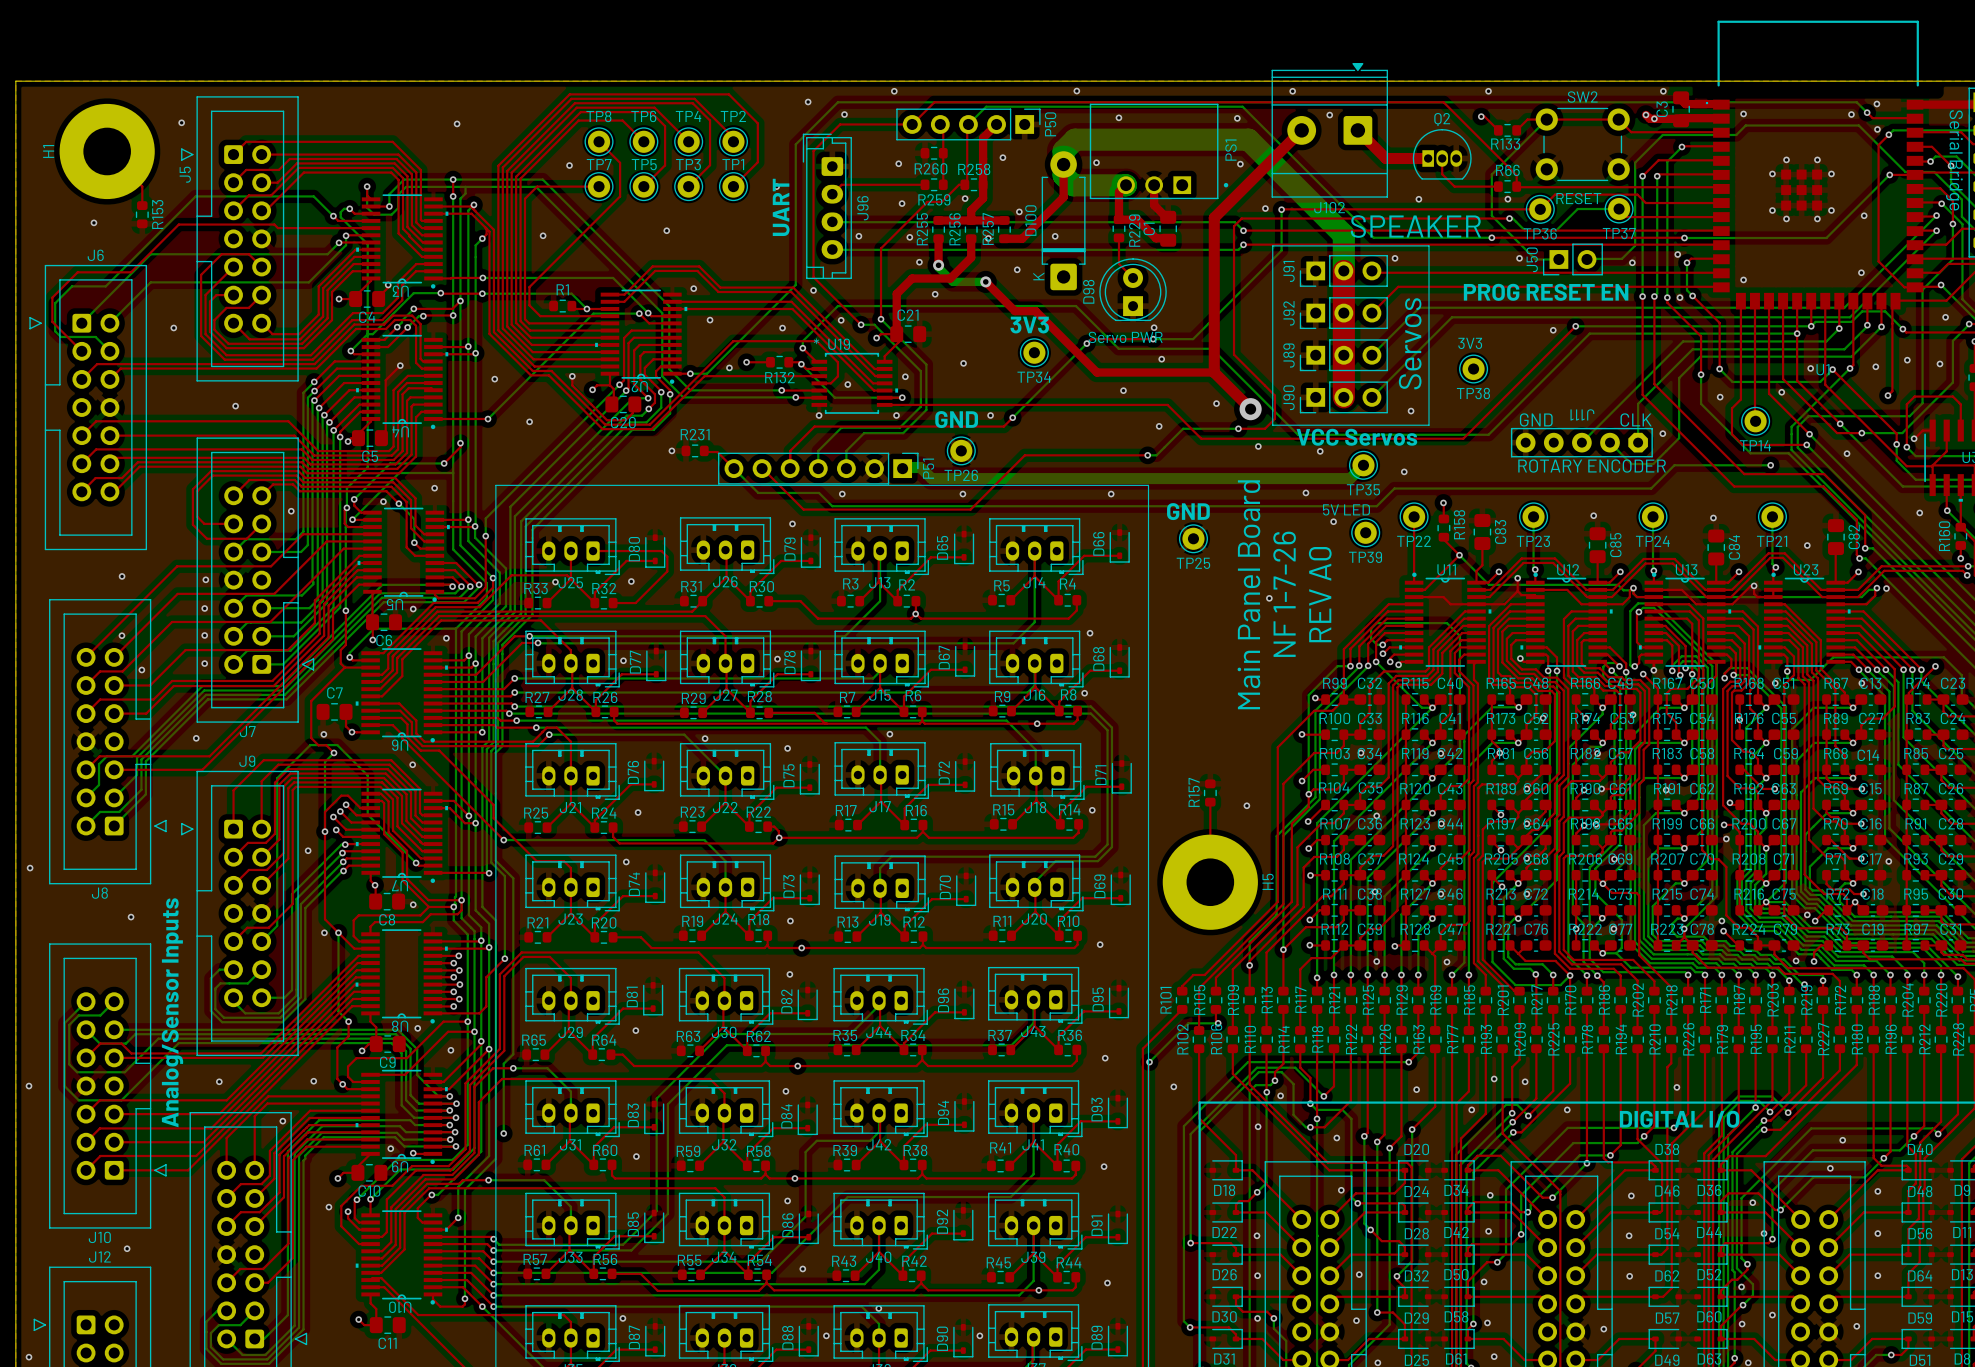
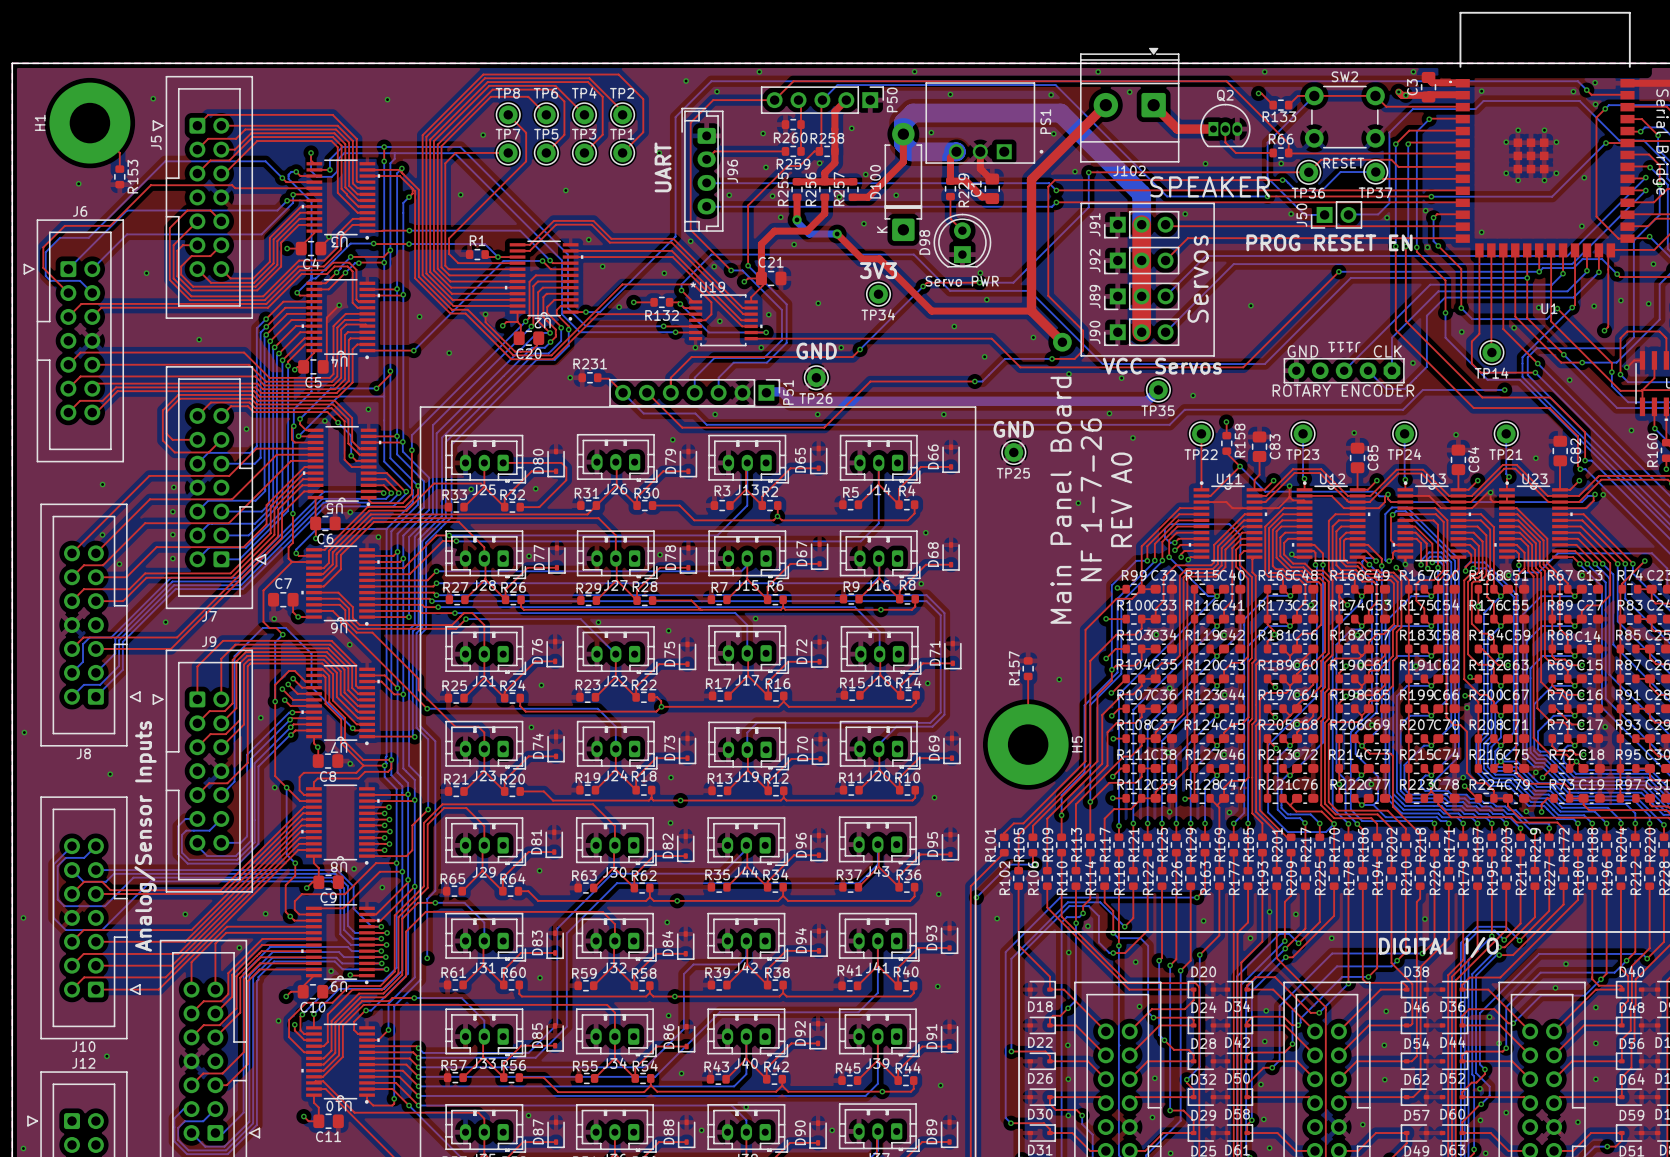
via: (1553, 330) -> none
text: 3V3 (1470, 343) -> none
via: none -> (1250, 305)
TP38: (1473, 369) -> none
via: (1411, 411) -> none
text: 5V LED (1346, 509) -> none
TP39: (1365, 532) -> none

